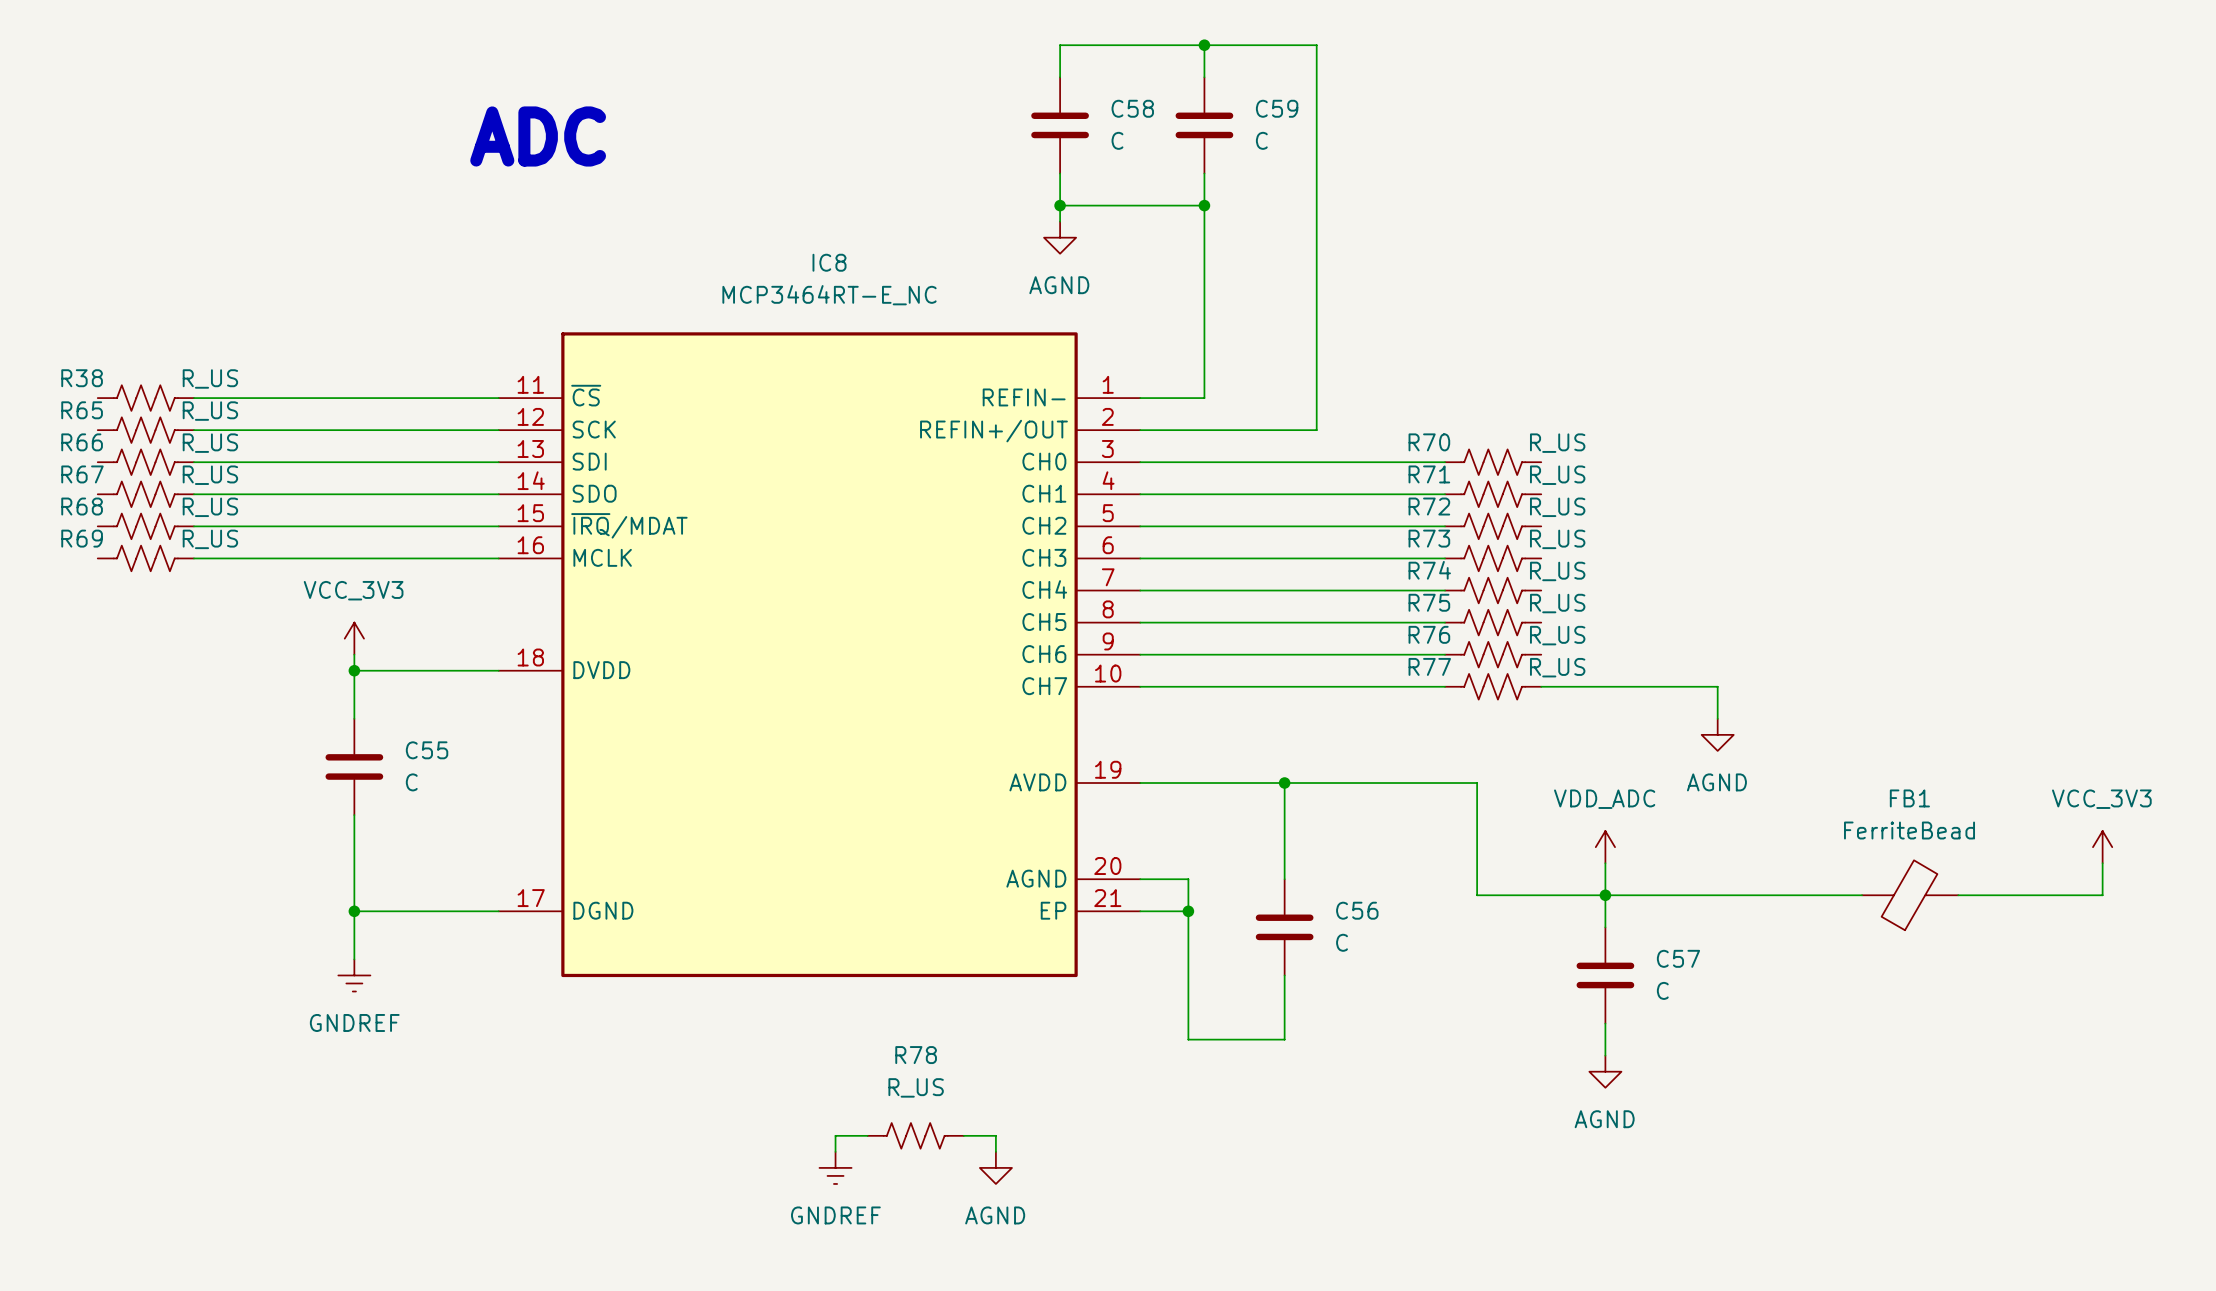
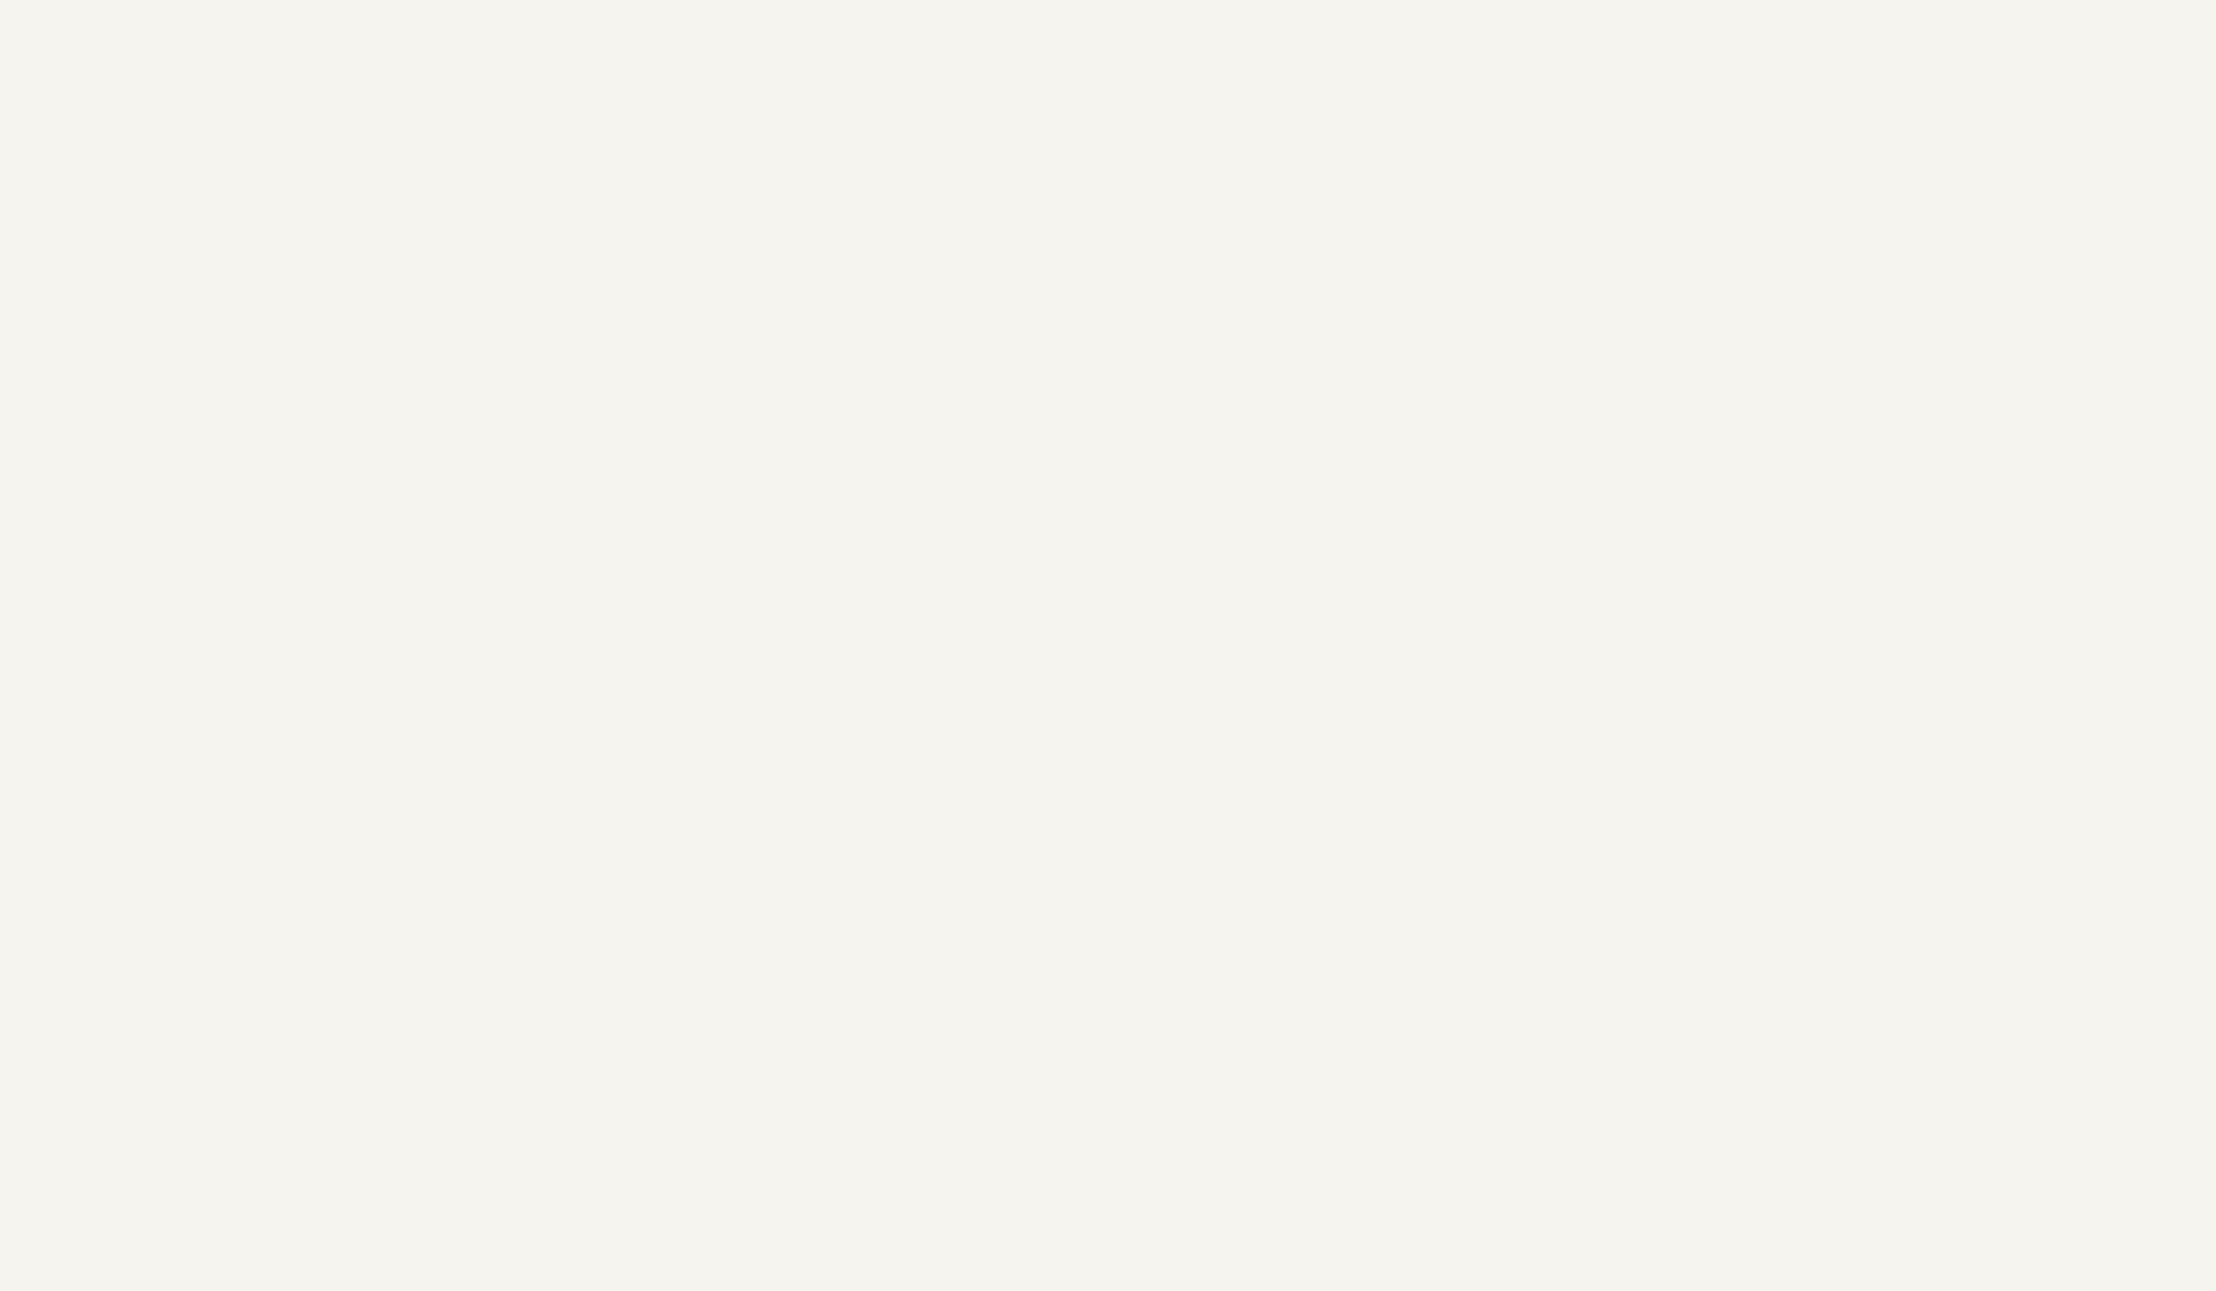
wire: (1204, 45) (1204, 77) -> none
junction: (1204, 45) -> none
wire: (1060, 77) (1060, 45) (1316, 45) (1316, 430) (1140, 430) -> none
C58: C (1060, 125) -> none
C59: C (1204, 125) -> none
text: ADC (538, 136) -> none
wire: (1060, 173) (1060, 221) -> none
wire: (1204, 173) (1204, 398) (1140, 398) -> none
wire: (1060, 205) (1204, 205) -> none
junction: (1060, 205) -> none
junction: (1204, 205) -> none
power symbol: AGND (1060, 237) -> none
R38: R_US (145, 398) -> none
wire: (193, 398) (498, 398) -> none
R65: R_US (145, 430) -> none
wire: (193, 430) (498, 430) -> none
R66: R_US (145, 462) -> none
wire: (193, 462) (498, 462) -> none
wire: (1140, 462) (1445, 462) -> none
R70: R_US (1493, 462) -> none
R67: R_US (145, 494) -> none
wire: (193, 494) (498, 494) -> none
wire: (1140, 494) (1445, 494) -> none
R71: R_US (1493, 494) -> none
R68: R_US (145, 526) -> none
wire: (193, 526) (498, 526) -> none
wire: (1140, 526) (1445, 526) -> none
R72: R_US (1493, 526) -> none
R69: R_US (145, 558) -> none
wire: (193, 558) (498, 558) -> none
wire: (1140, 558) (1445, 558) -> none
R73: R_US (1493, 558) -> none
wire: (1140, 590) (1445, 590) -> none
R74: R_US (1493, 590) -> none
wire: (1140, 622) (1445, 622) -> none
R75: R_US (1493, 622) -> none
power symbol: VCC_3V3 (354, 638) -> none
wire: (354, 654) (354, 718) -> none
IC8: MCP3464RT-E_NC (819, 654) -> none
wire: (1140, 654) (1445, 654) -> none
R76: R_US (1493, 654) -> none
wire: (354, 670) (498, 670) -> none
junction: (354, 670) -> none
wire: (1140, 686) (1445, 686) -> none
R77: R_US (1493, 686) -> none
wire: (1541, 686) (1717, 686) (1717, 718) -> none
power symbol: AGND (1717, 734) -> none
C55: C (354, 766) -> none
wire: (1140, 783) (1477, 783) (1477, 895) (1862, 895) -> none
wire: (1284, 783) (1284, 879) -> none
junction: (1284, 783) -> none
wire: (354, 815) (354, 959) -> none
power symbol: VDD_ADC (1605, 847) -> none
power symbol: VCC_3V3 (2102, 847) -> none
wire: (1605, 863) (1605, 927) -> none
wire: (2102, 863) (2102, 895) (1958, 895) -> none
wire: (1140, 879) (1188, 879) (1188, 1039) (1284, 1039) (1284, 975) -> none
junction: (1605, 895) -> none
FB1: FerriteBead (1910, 895) -> none
wire: (354, 911) (498, 911) -> none
junction: (354, 911) -> none
wire: (1140, 911) (1188, 911) -> none
junction: (1188, 911) -> none
C56: C (1284, 927) -> none
power symbol: GNDREF (354, 975) -> none
C57: C (1605, 975) -> none
wire: (1605, 1023) (1605, 1055) -> none
power symbol: AGND (1605, 1071) -> none
wire: (867, 1135) (835, 1135) (835, 1151) -> none
R78: R_US (915, 1135) -> none
wire: (963, 1135) (995, 1135) (995, 1151) -> none
power symbol: GNDREF (835, 1167) -> none
power symbol: AGND (995, 1167) -> none

